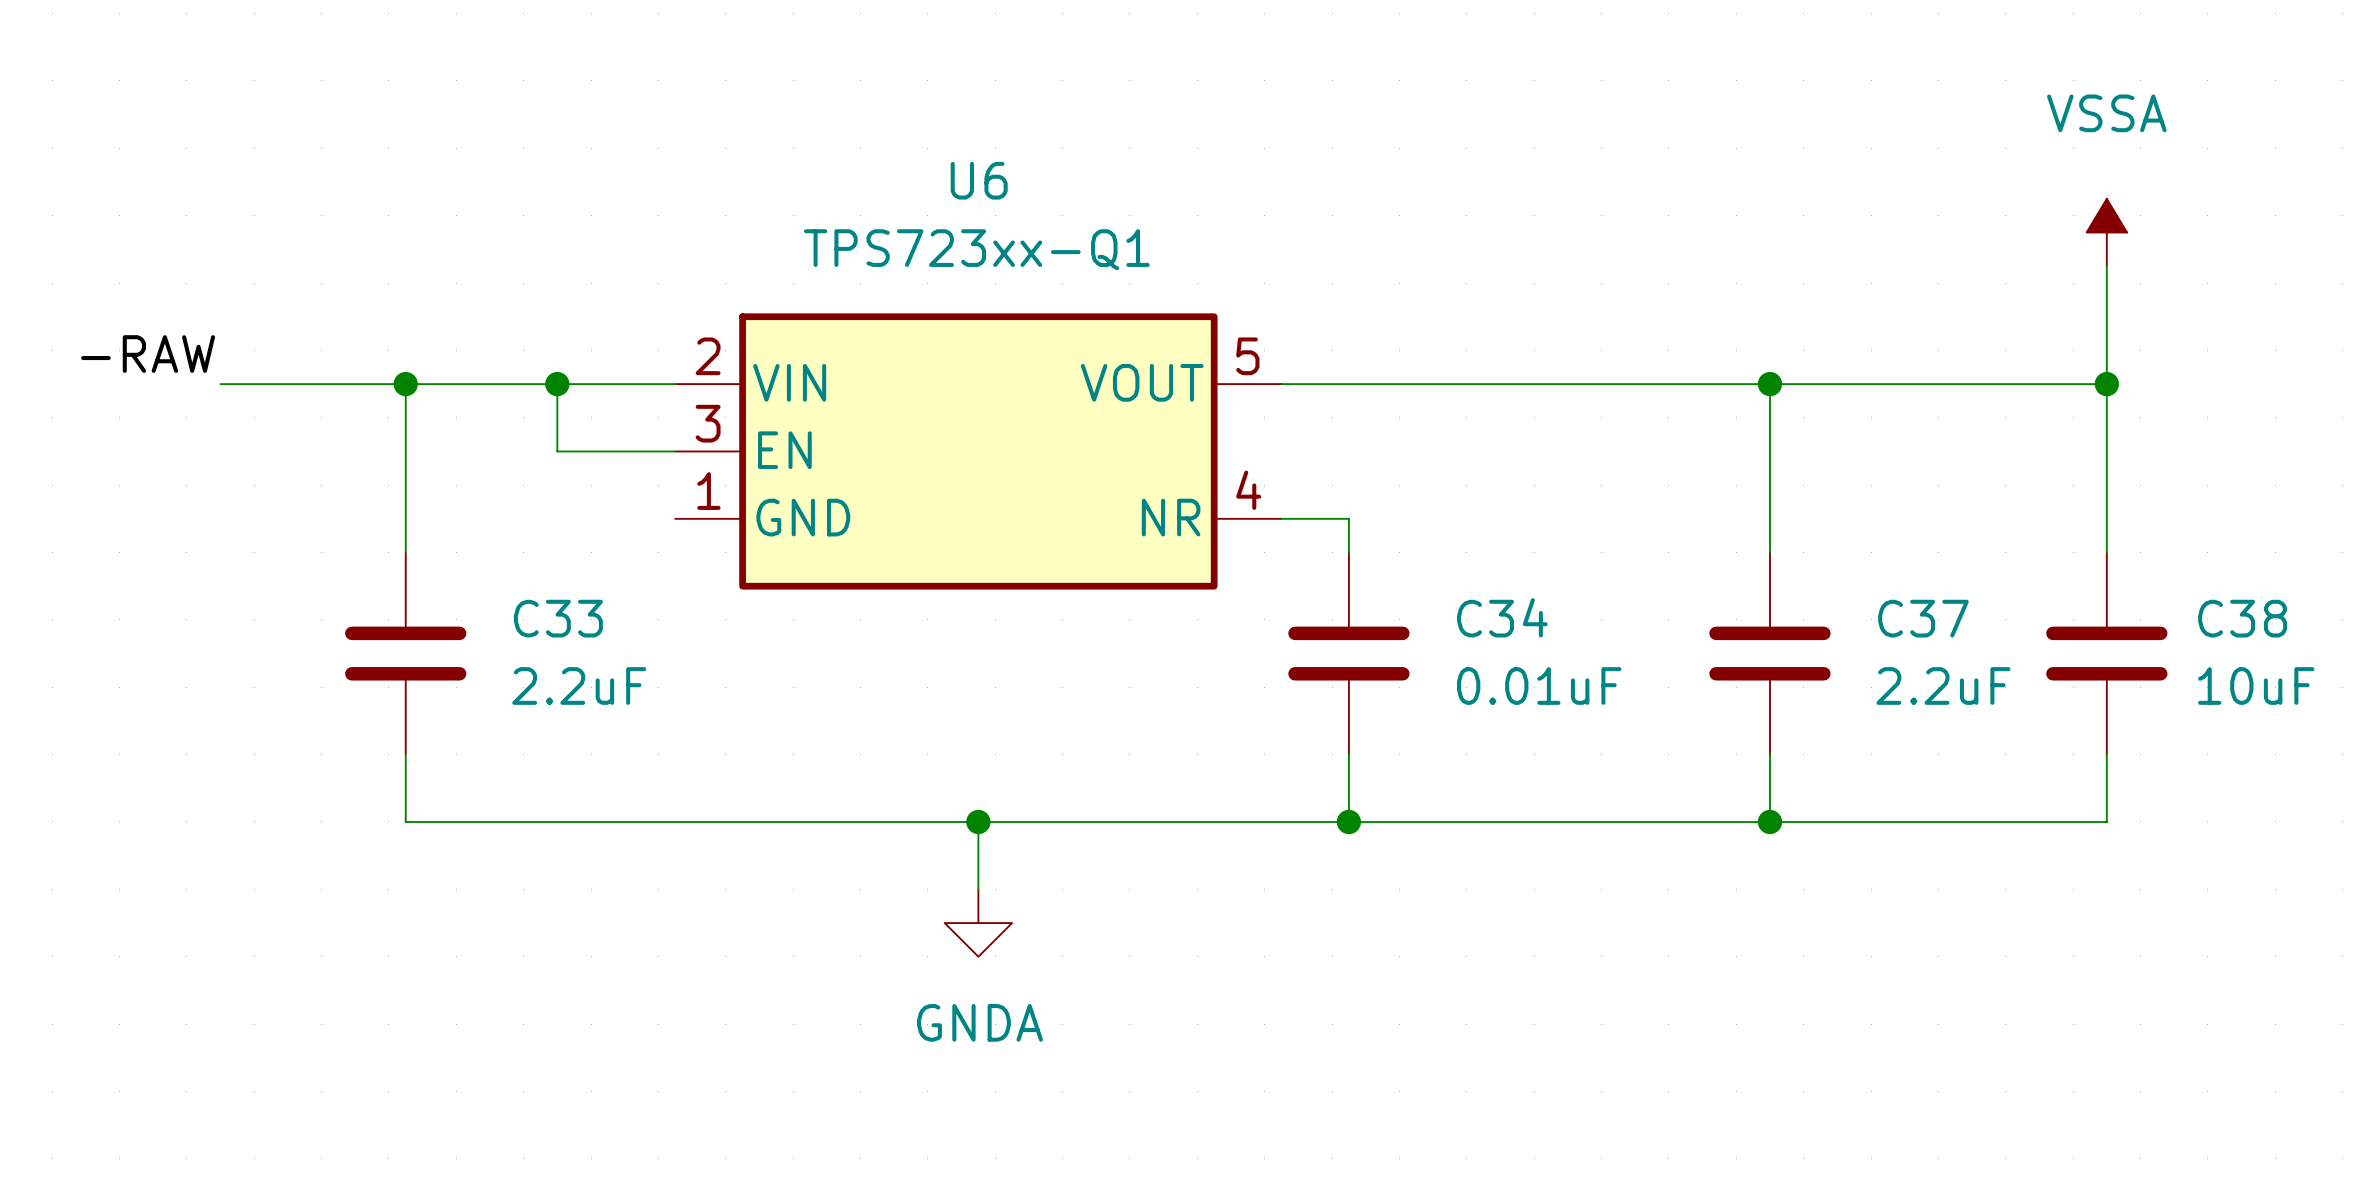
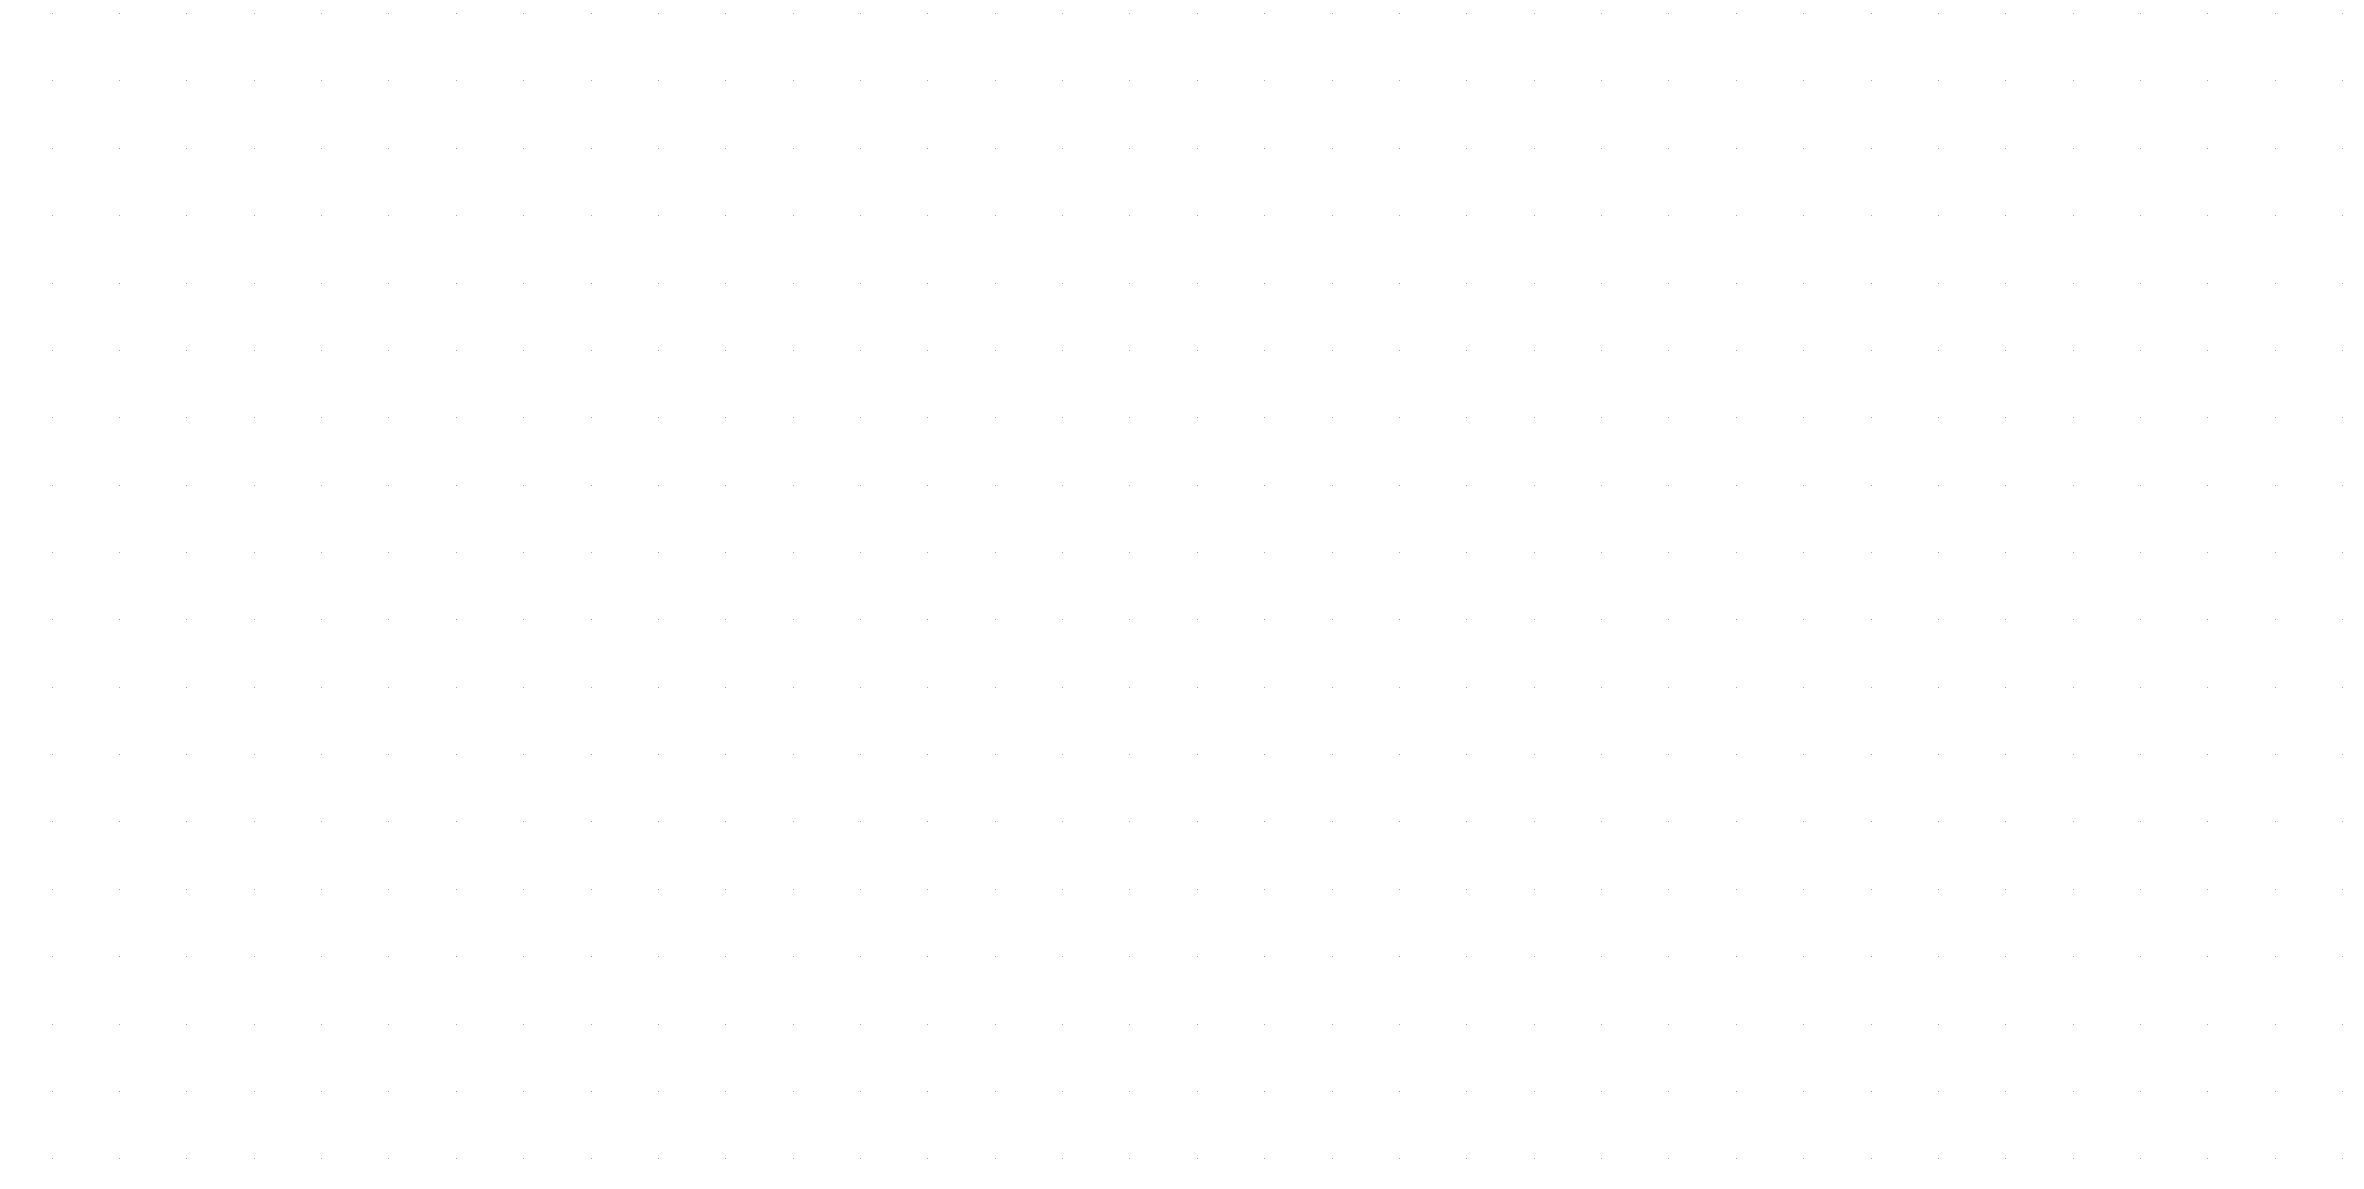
power symbol: VSSA (2106, 232) -> none
wire: (2106, 266) (2106, 552) -> none
label: -RAW (148, 354) -> none
wire: (220, 384) (675, 384) -> none
wire: (405, 384) (405, 552) -> none
junction: (405, 384) -> none
wire: (557, 384) (557, 451) (675, 451) -> none
junction: (557, 384) -> none
wire: (1281, 384) (2106, 384) -> none
wire: (1769, 384) (1769, 552) -> none
junction: (1769, 384) -> none
junction: (2106, 384) -> none
U6: TPS723xx-Q1 (978, 451) -> none
wire: (1281, 518) (1348, 518) (1348, 552) -> none
C33: 2.2uF (405, 653) -> none
C34: 0.01uF (1348, 653) -> none
C37: 2.2uF (1769, 653) -> none
C38: 10uF (2106, 653) -> none
wire: (405, 754) (405, 821) (2106, 821) (2106, 754) -> none
wire: (1348, 754) (1348, 821) -> none
wire: (1769, 754) (1769, 821) -> none
wire: (978, 821) (978, 889) -> none
junction: (978, 821) -> none
junction: (1348, 821) -> none
junction: (1769, 821) -> none
power symbol: GNDA (978, 923) -> none

